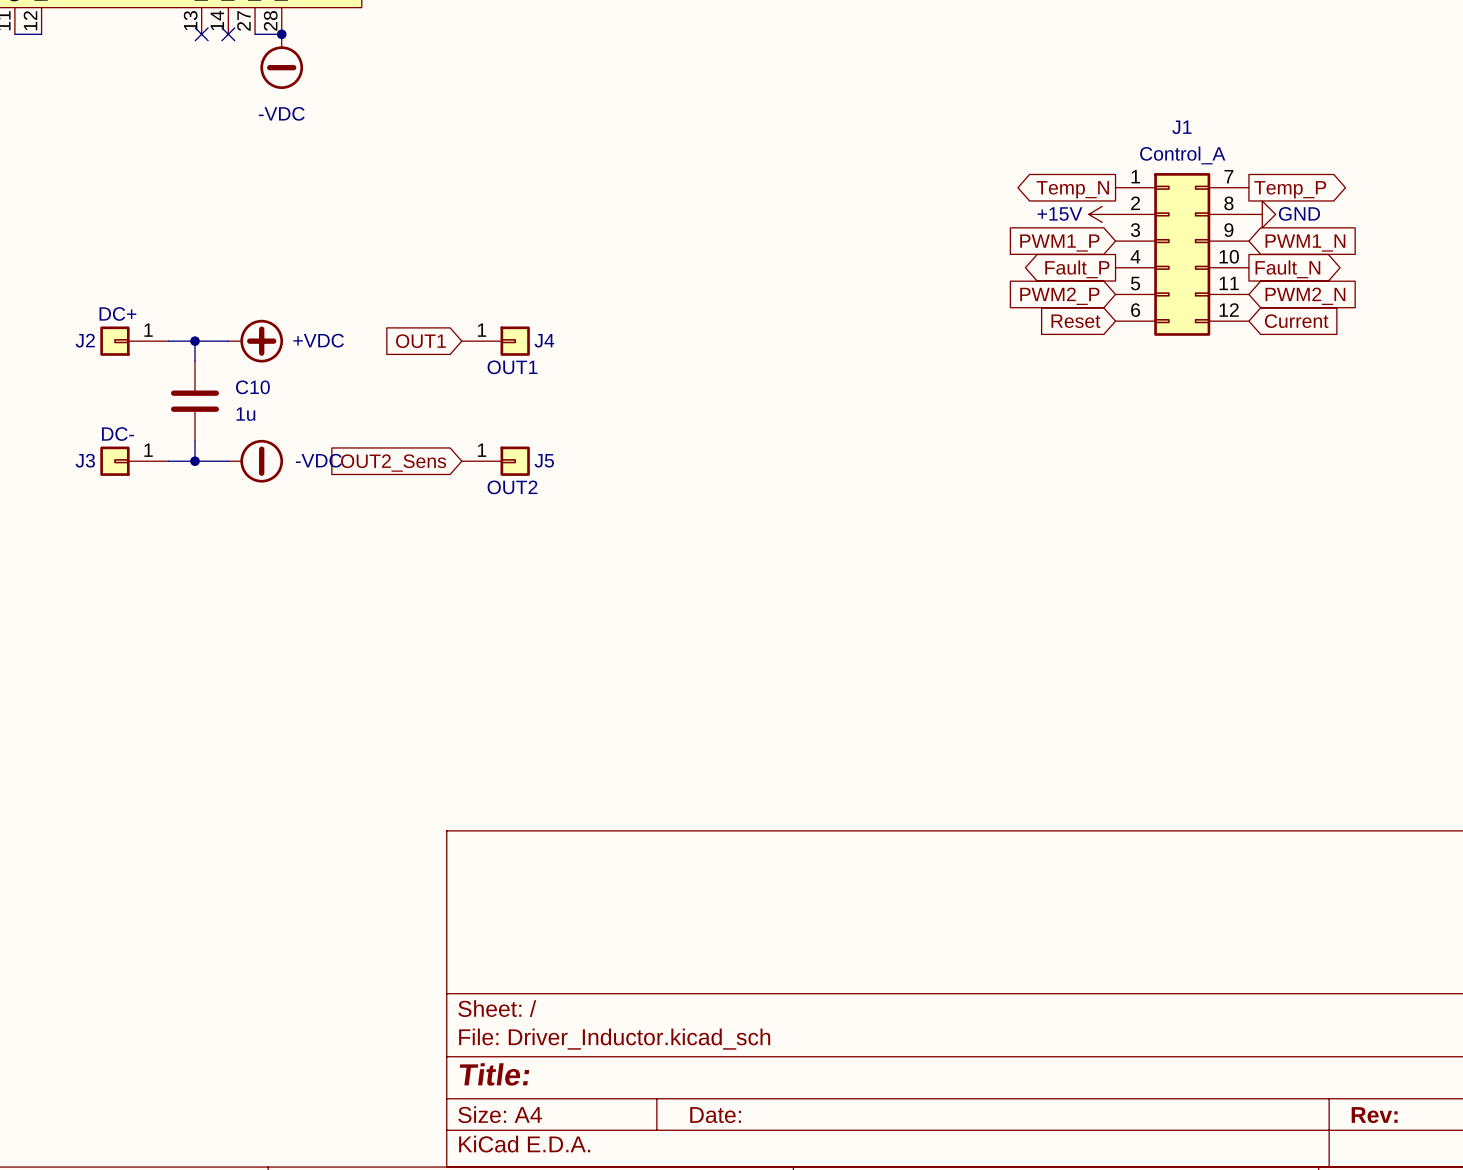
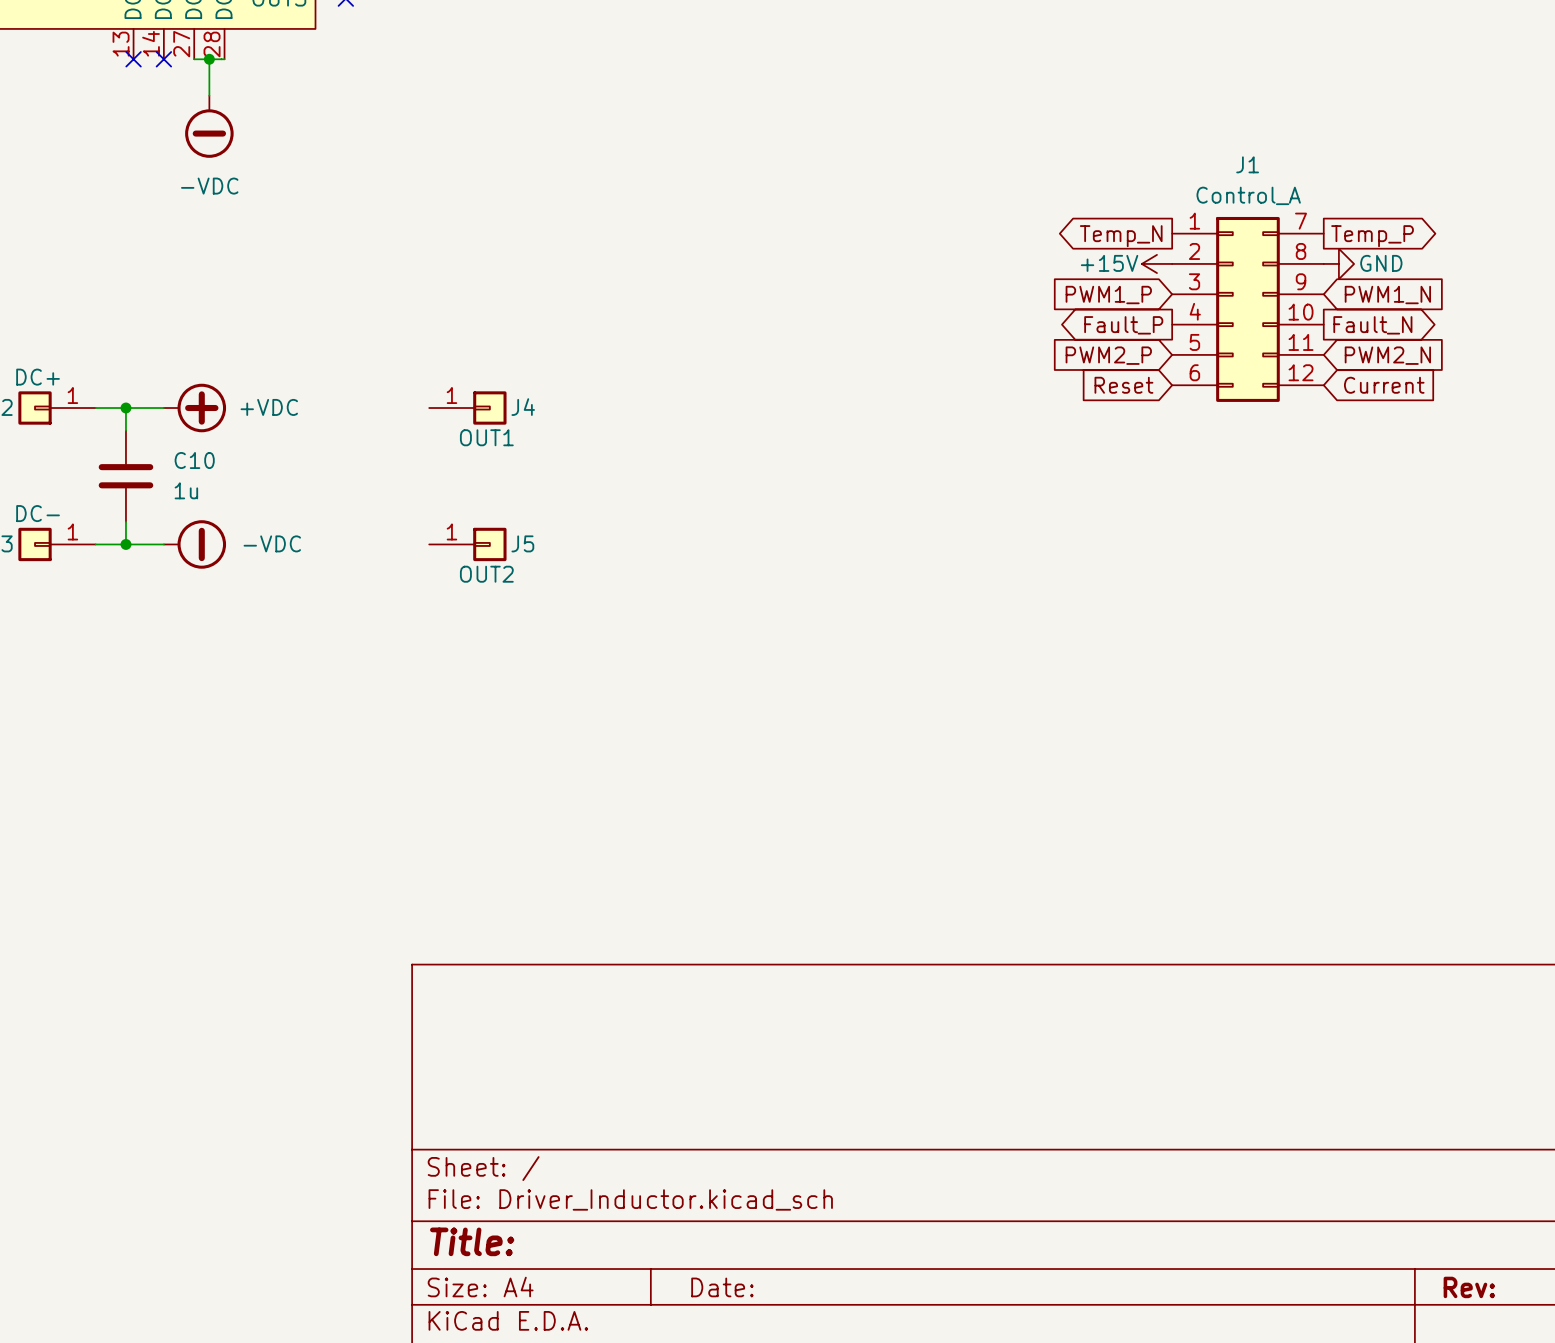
wire: none -> (209, 59) (209, 95)
junction position: (281, 34) -> (209, 59)
power symbol position: -VDC (281, 61) -> -VDC (209, 126)
global label: OUT1 (420, 341) -> none
global label: OUT2_Sens (393, 463) -> none

